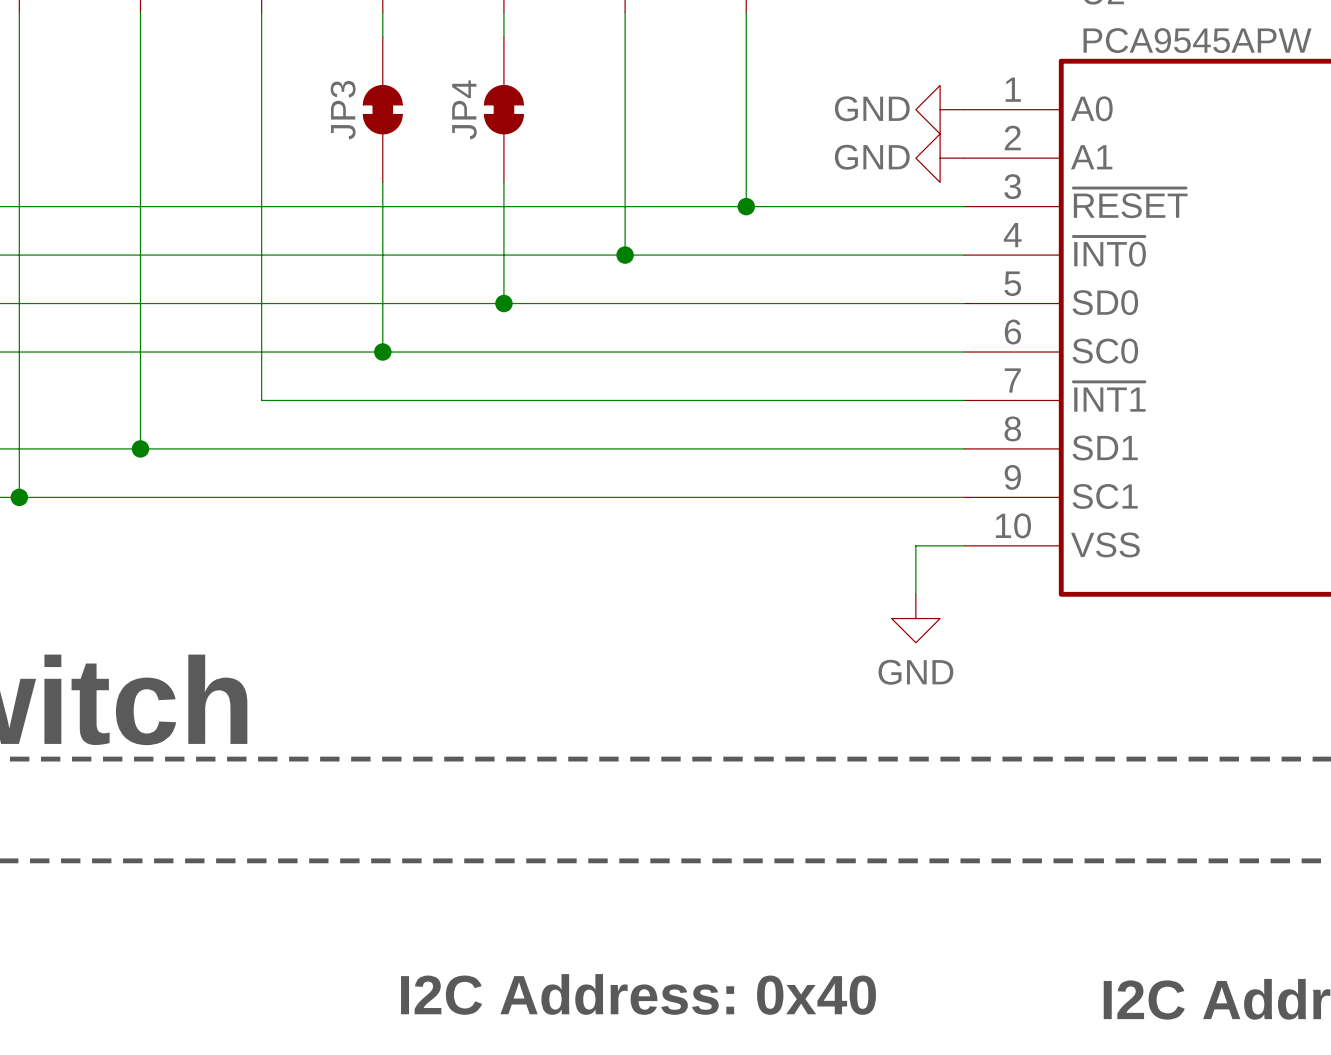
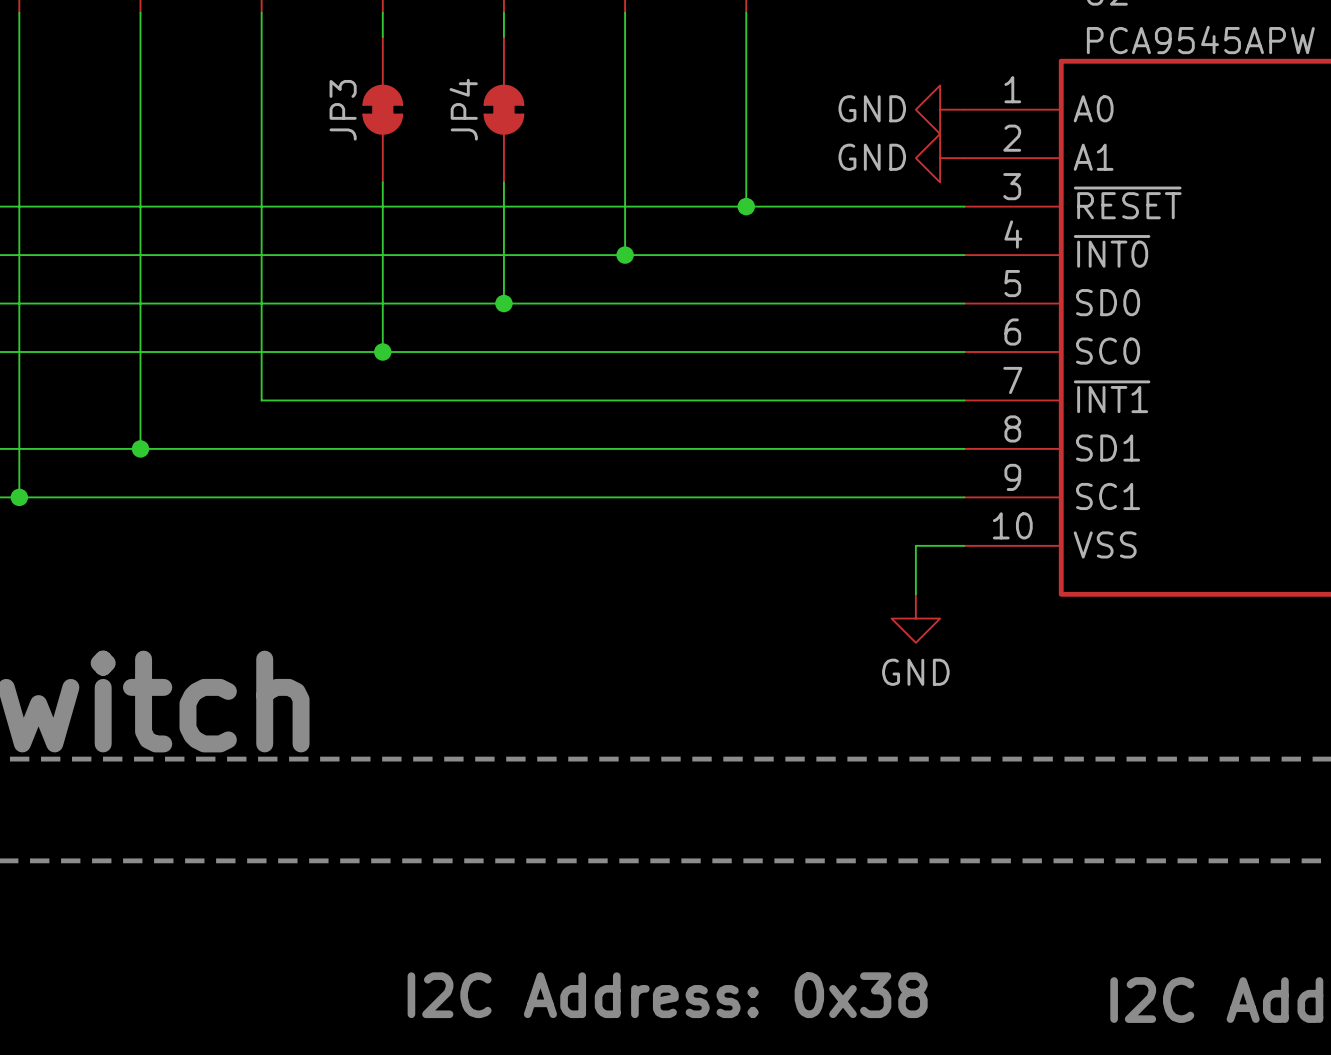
text: I2C Address: 0x40 (638, 994) -> I2C Address: 0x38 (667, 995)

